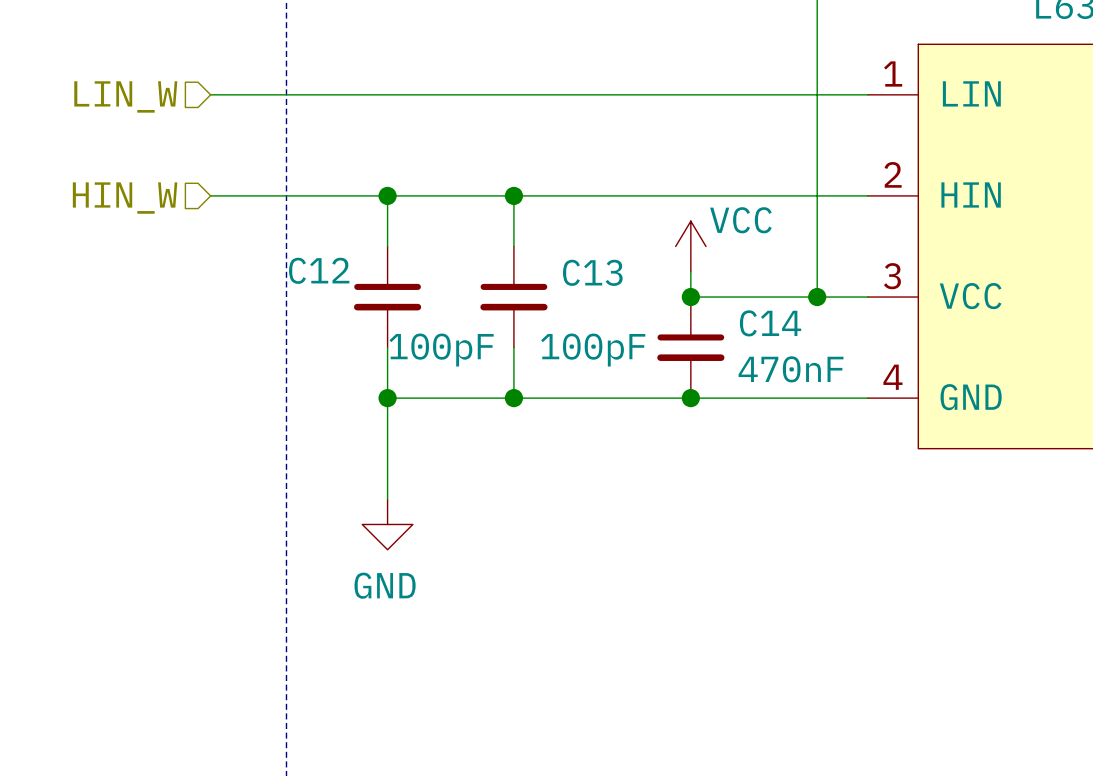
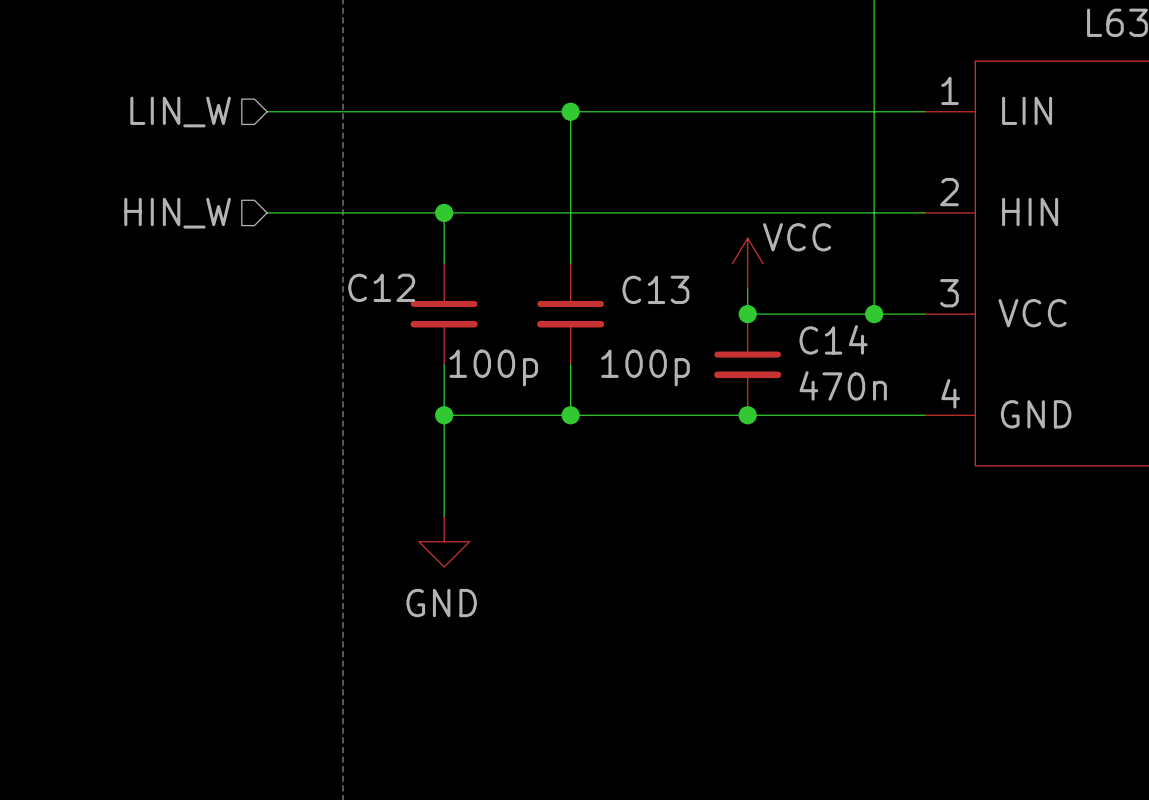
wire: none -> (570, 111) (570, 212)
junction position: (513, 195) -> (570, 111)
C12 value: 100pF (441, 350) -> 100p (493, 367)
C13 value: 100pF (593, 350) -> 100p (645, 367)
C14 value: 470nF (791, 369) -> 470n (843, 385)

